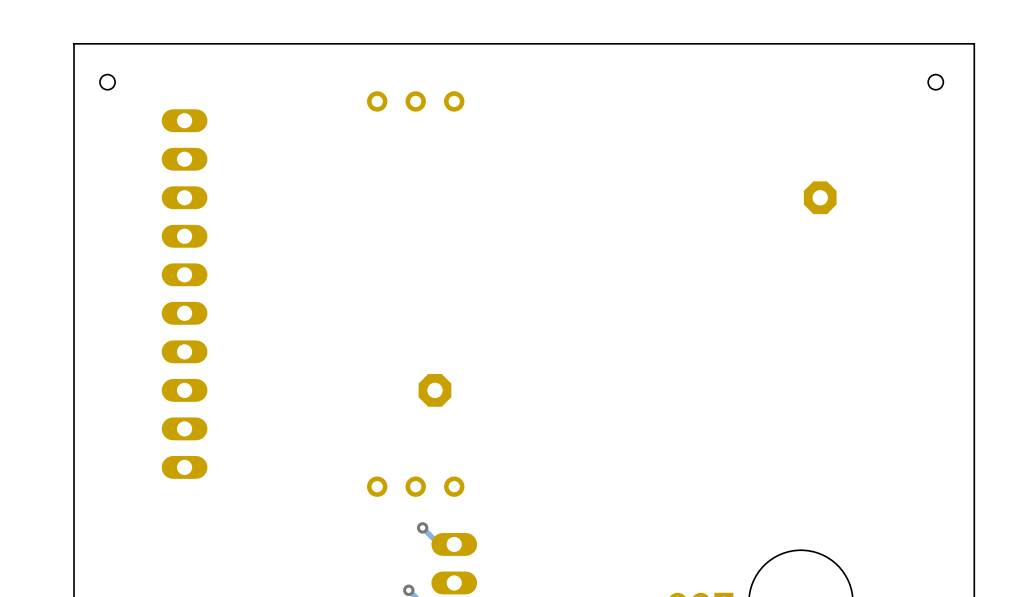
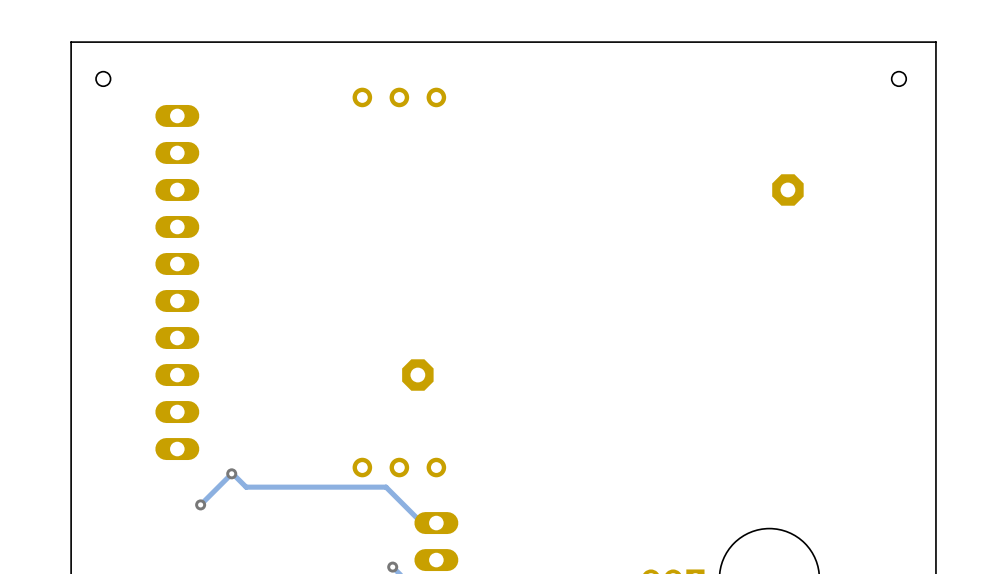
via: none -> (231, 473)
track: none -> (200, 504) (231, 473) (246, 487) (386, 487) (406, 507)
via: none -> (200, 504)
via: (422, 527) -> none

